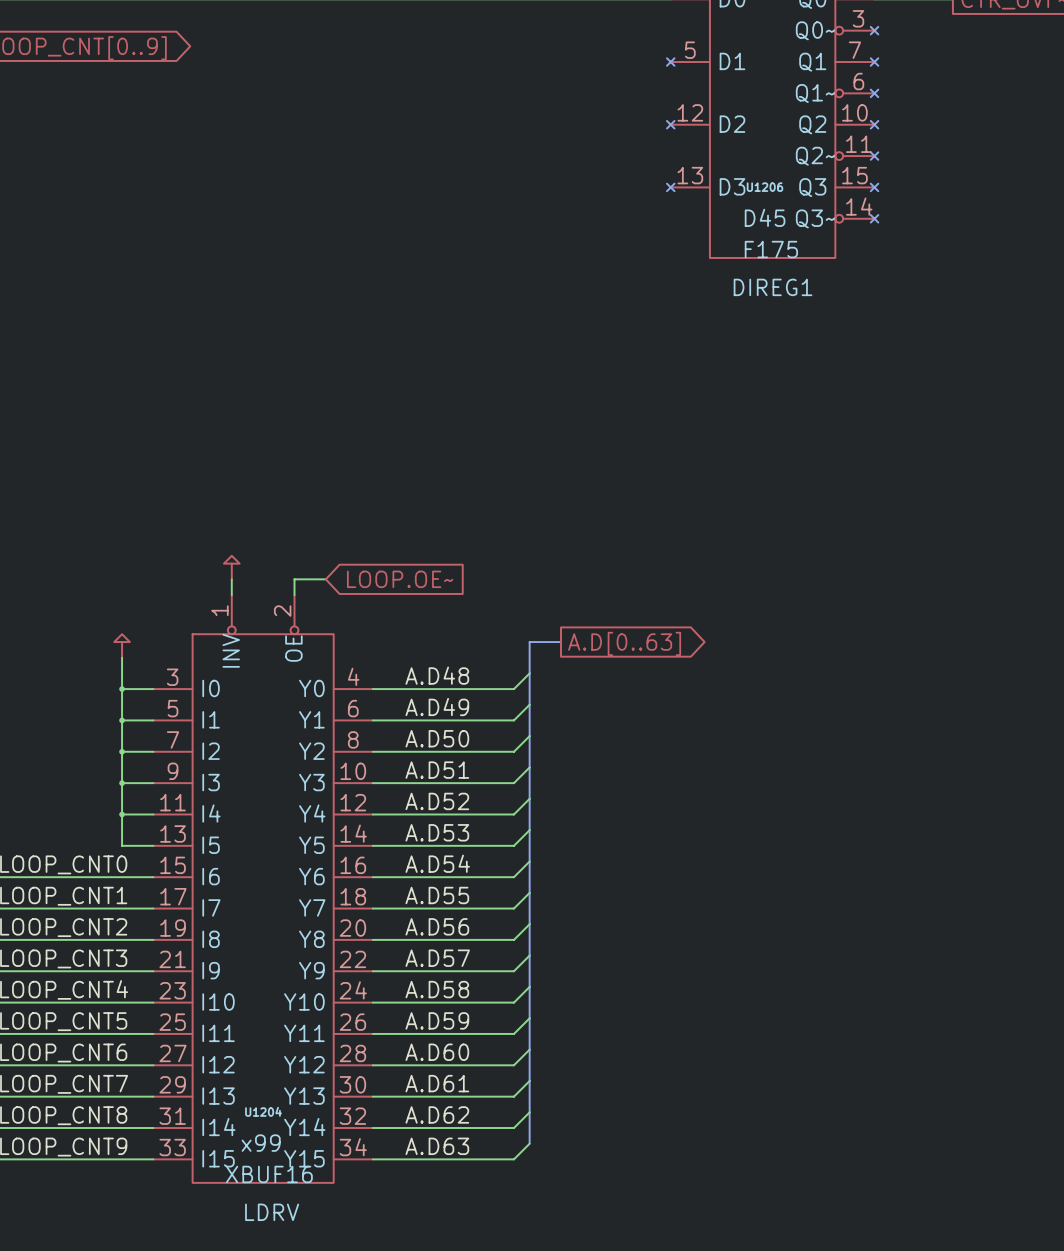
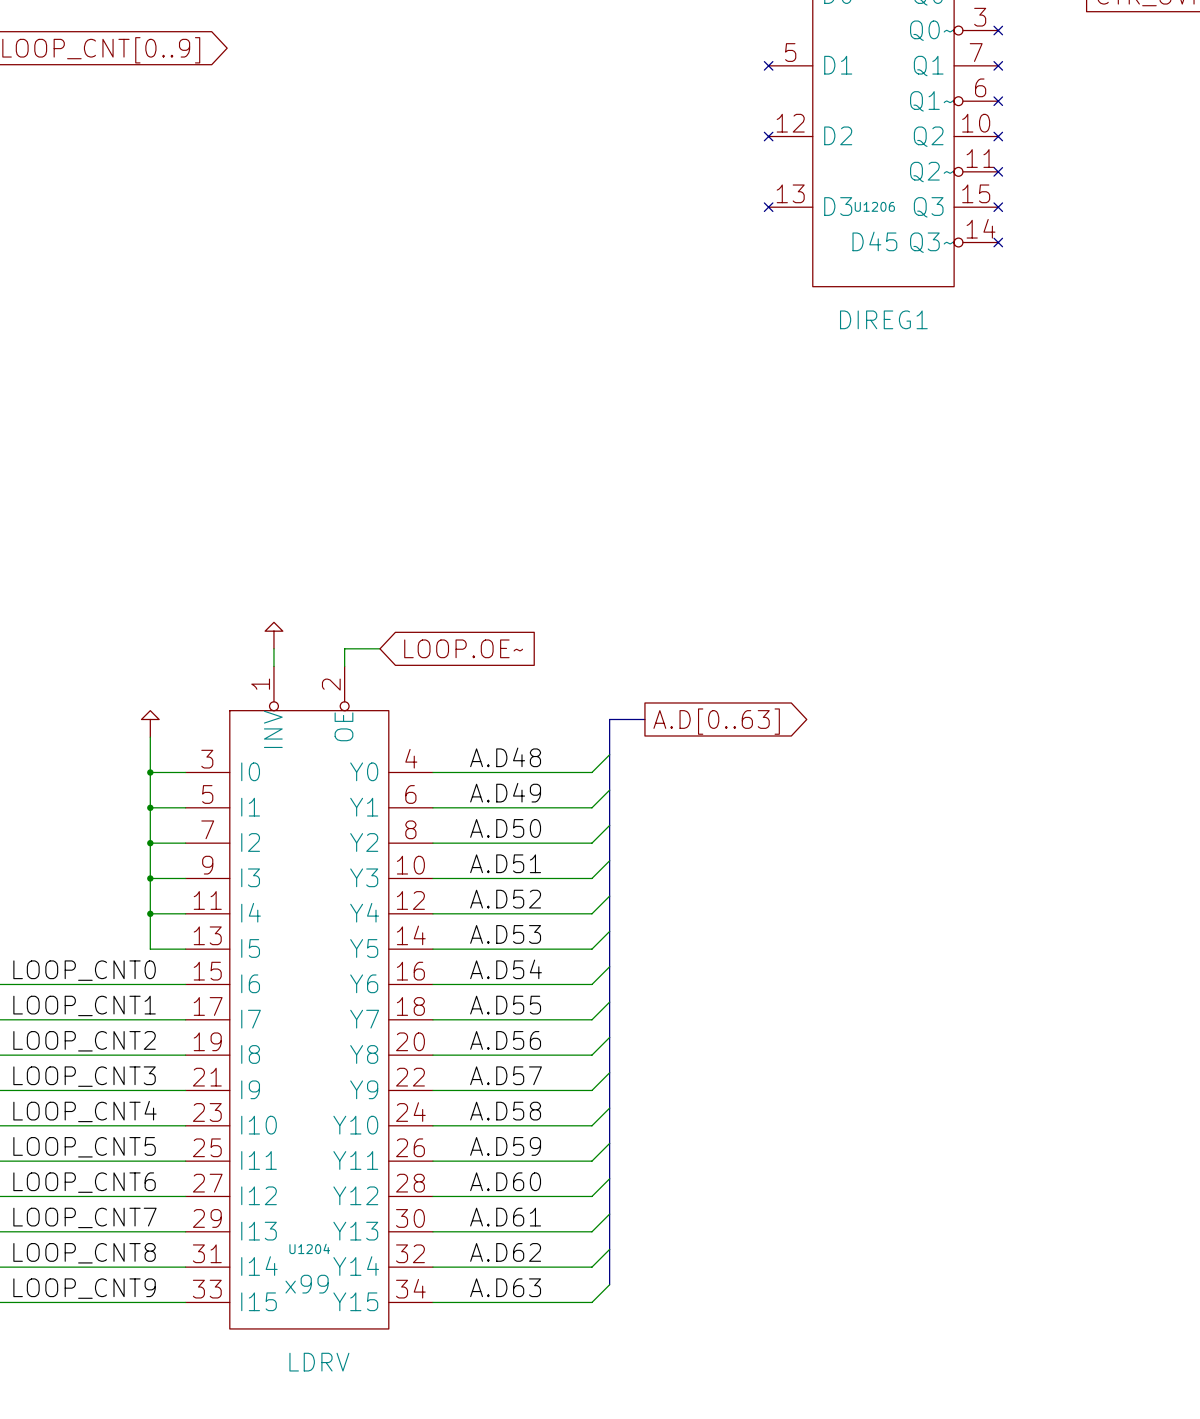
U1206 value: F175 (771, 249) -> none
U1204 value: XBUF16 (269, 1174) -> none

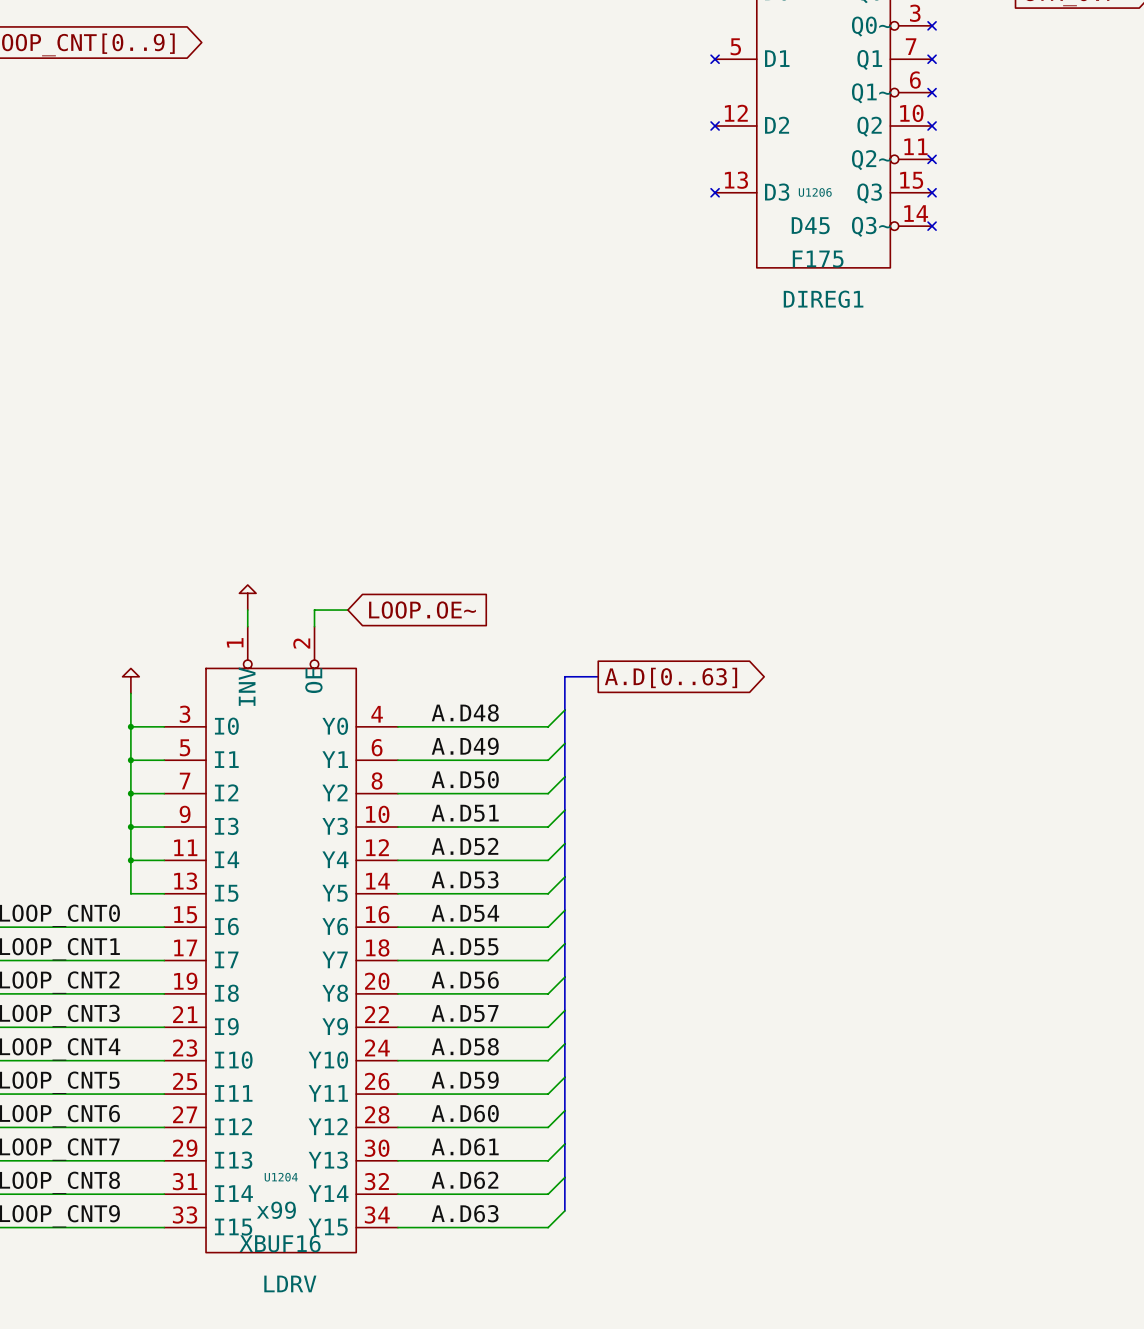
U1206 value: none -> F175 (818, 259)
U1204 value: none -> XBUF16 (280, 1243)

